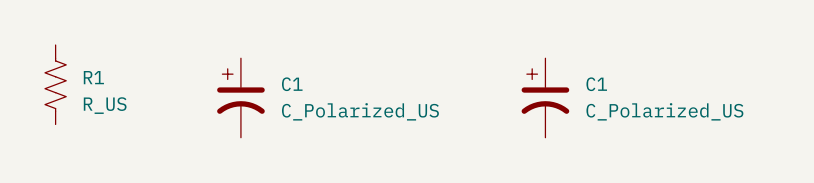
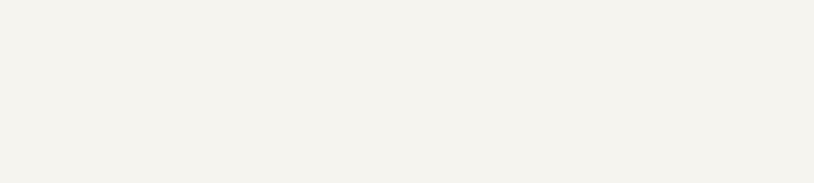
R1: R_US (55, 84) -> none
C1: C_Polarized_US (240, 97) -> none
C1: C_Polarized_US (545, 97) -> none

